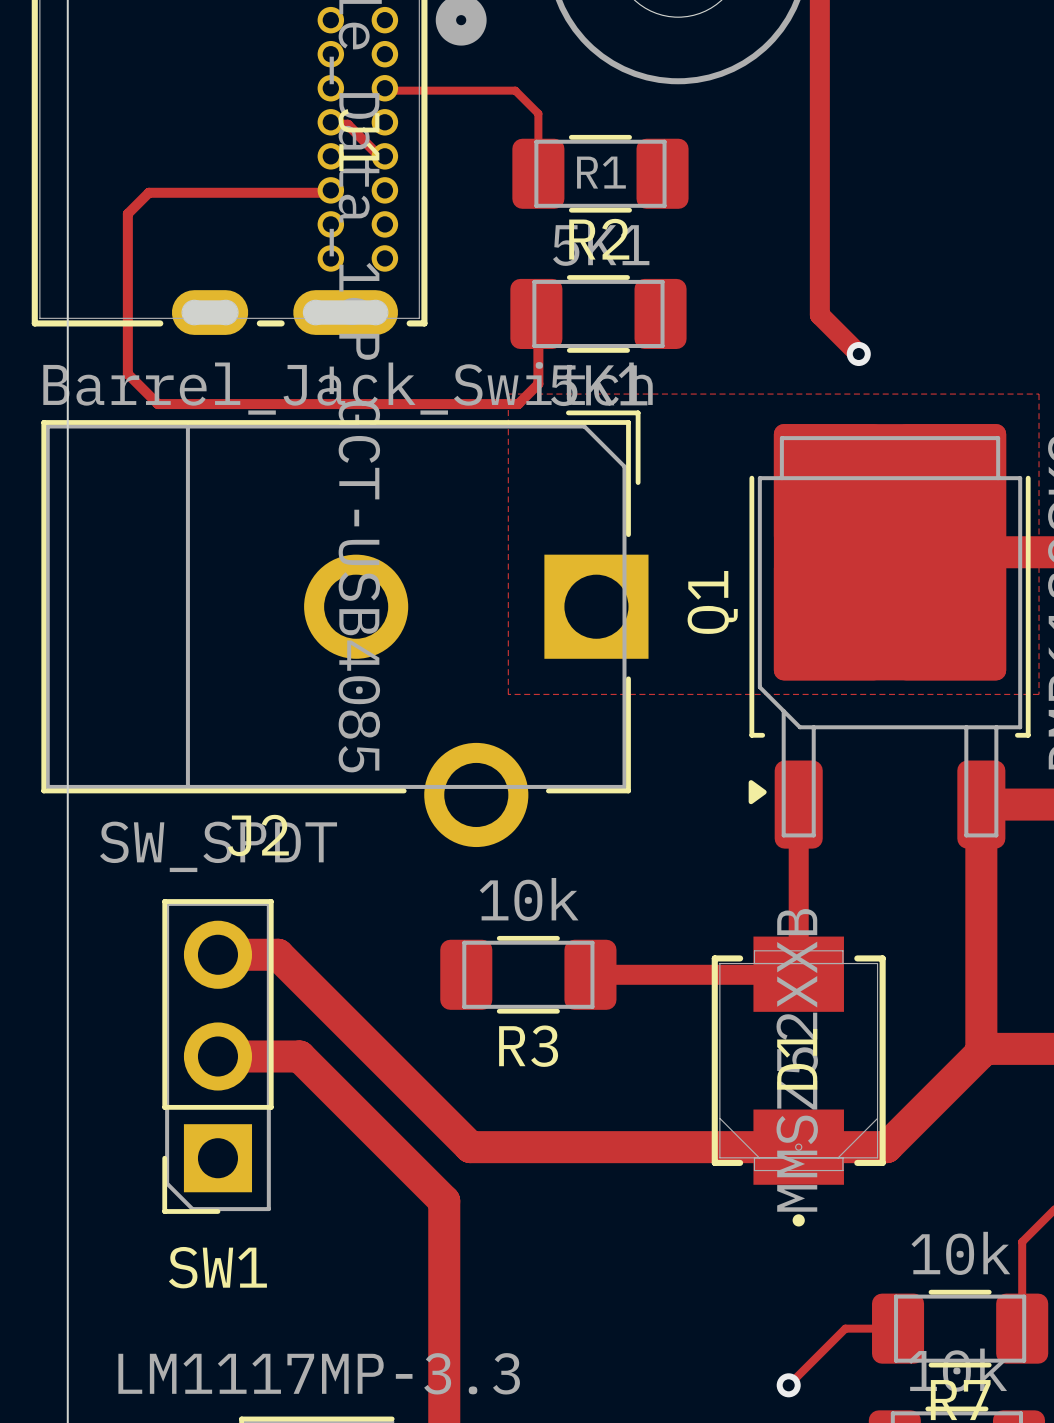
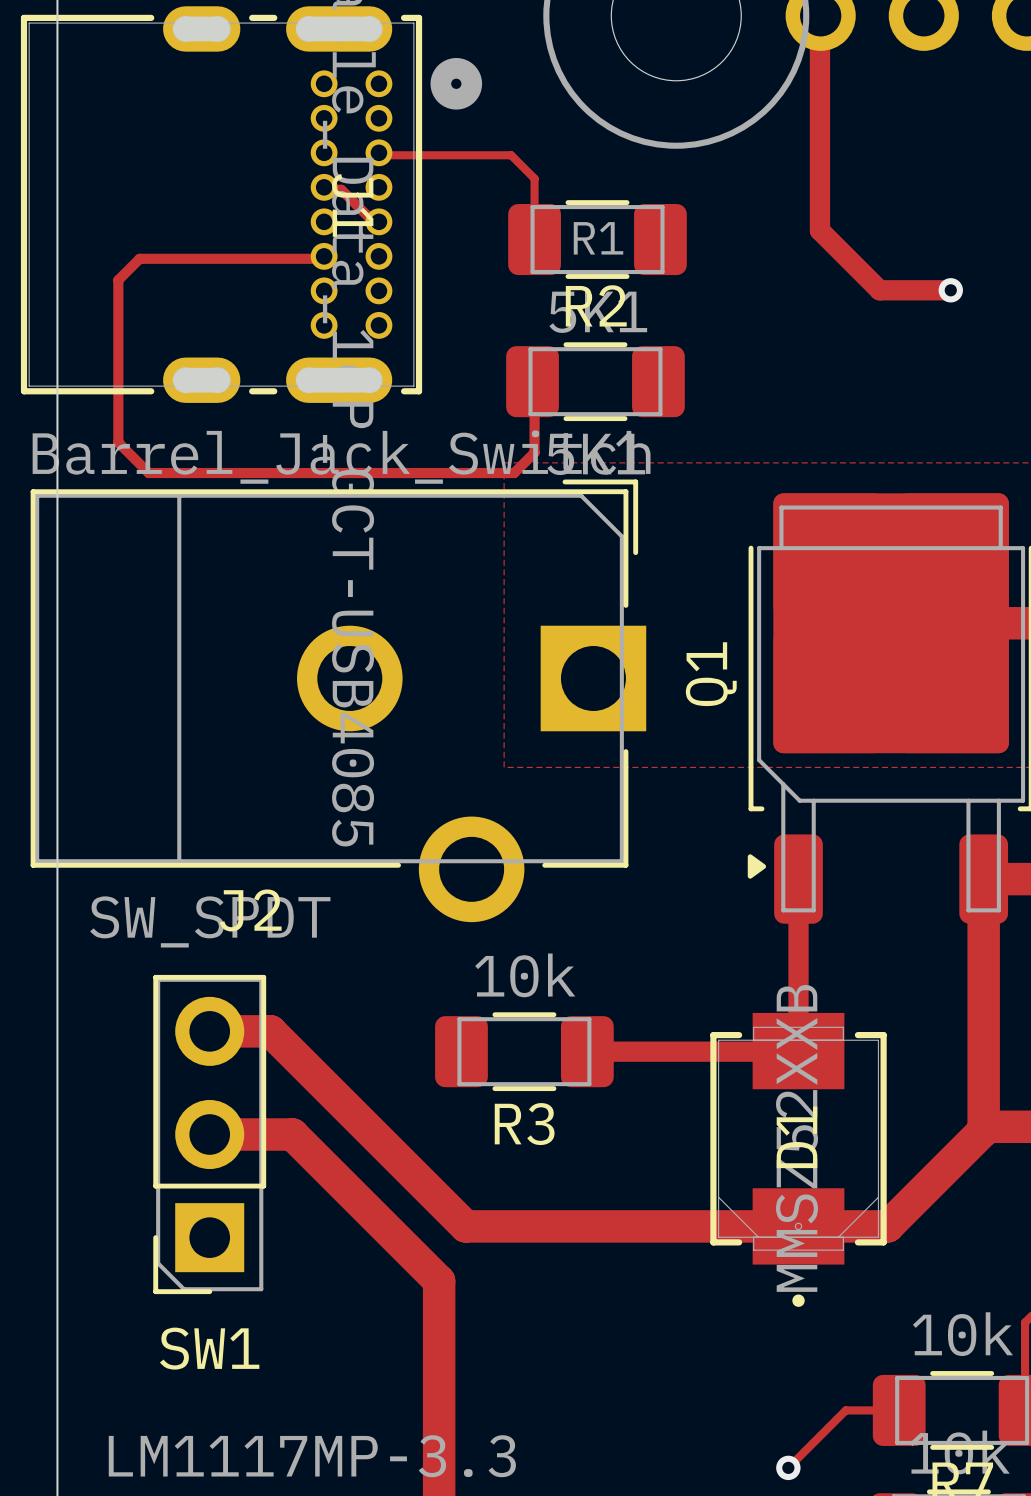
track: (819, 164) (819, 315) (858, 354) -> (819, 230) (879, 290) (950, 290)
via position: (858, 354) -> (950, 290)

